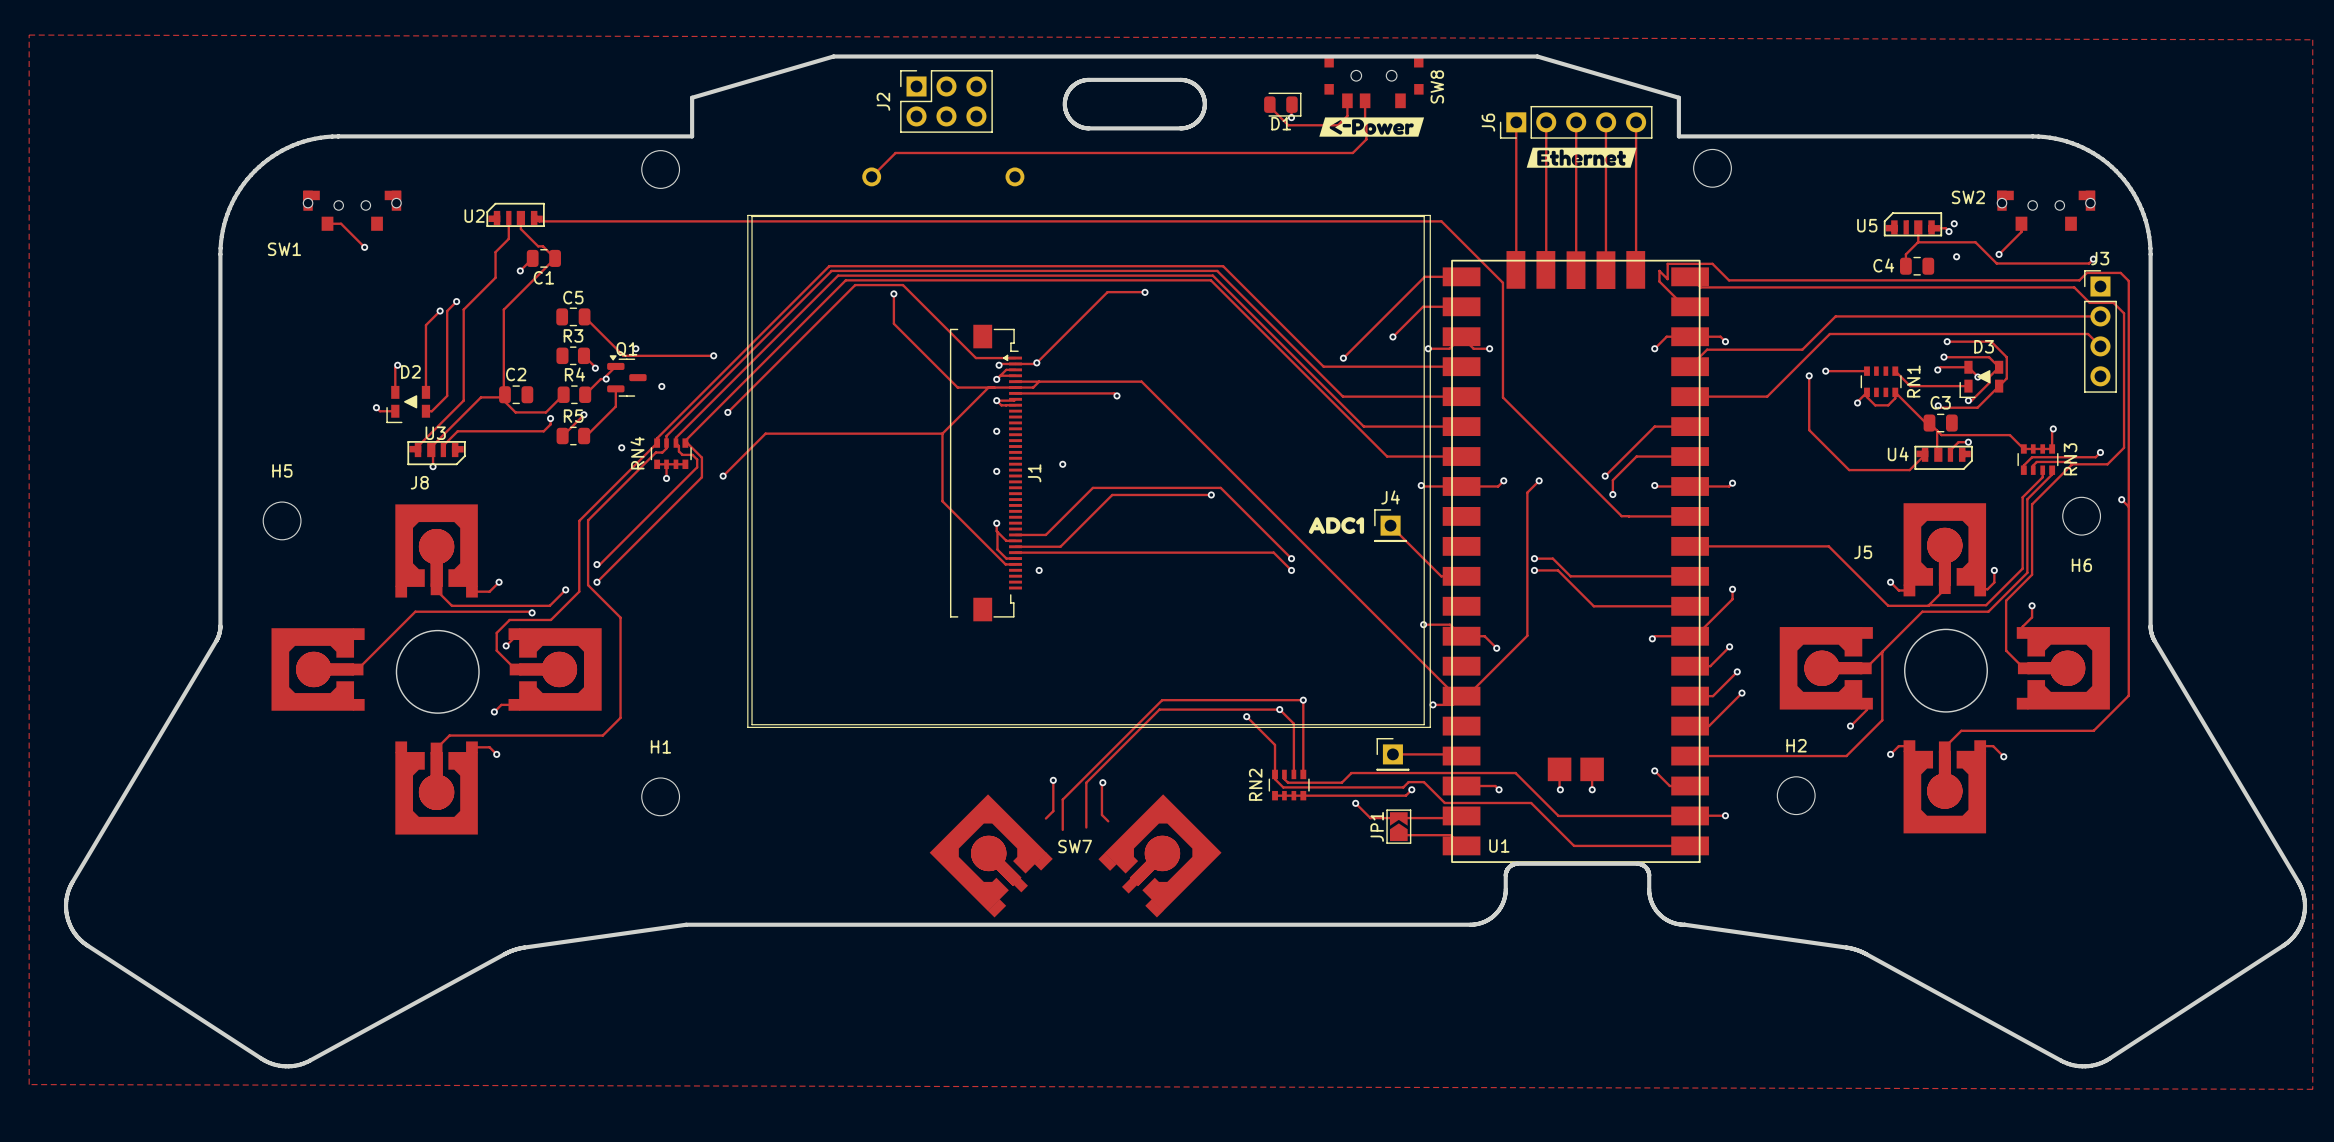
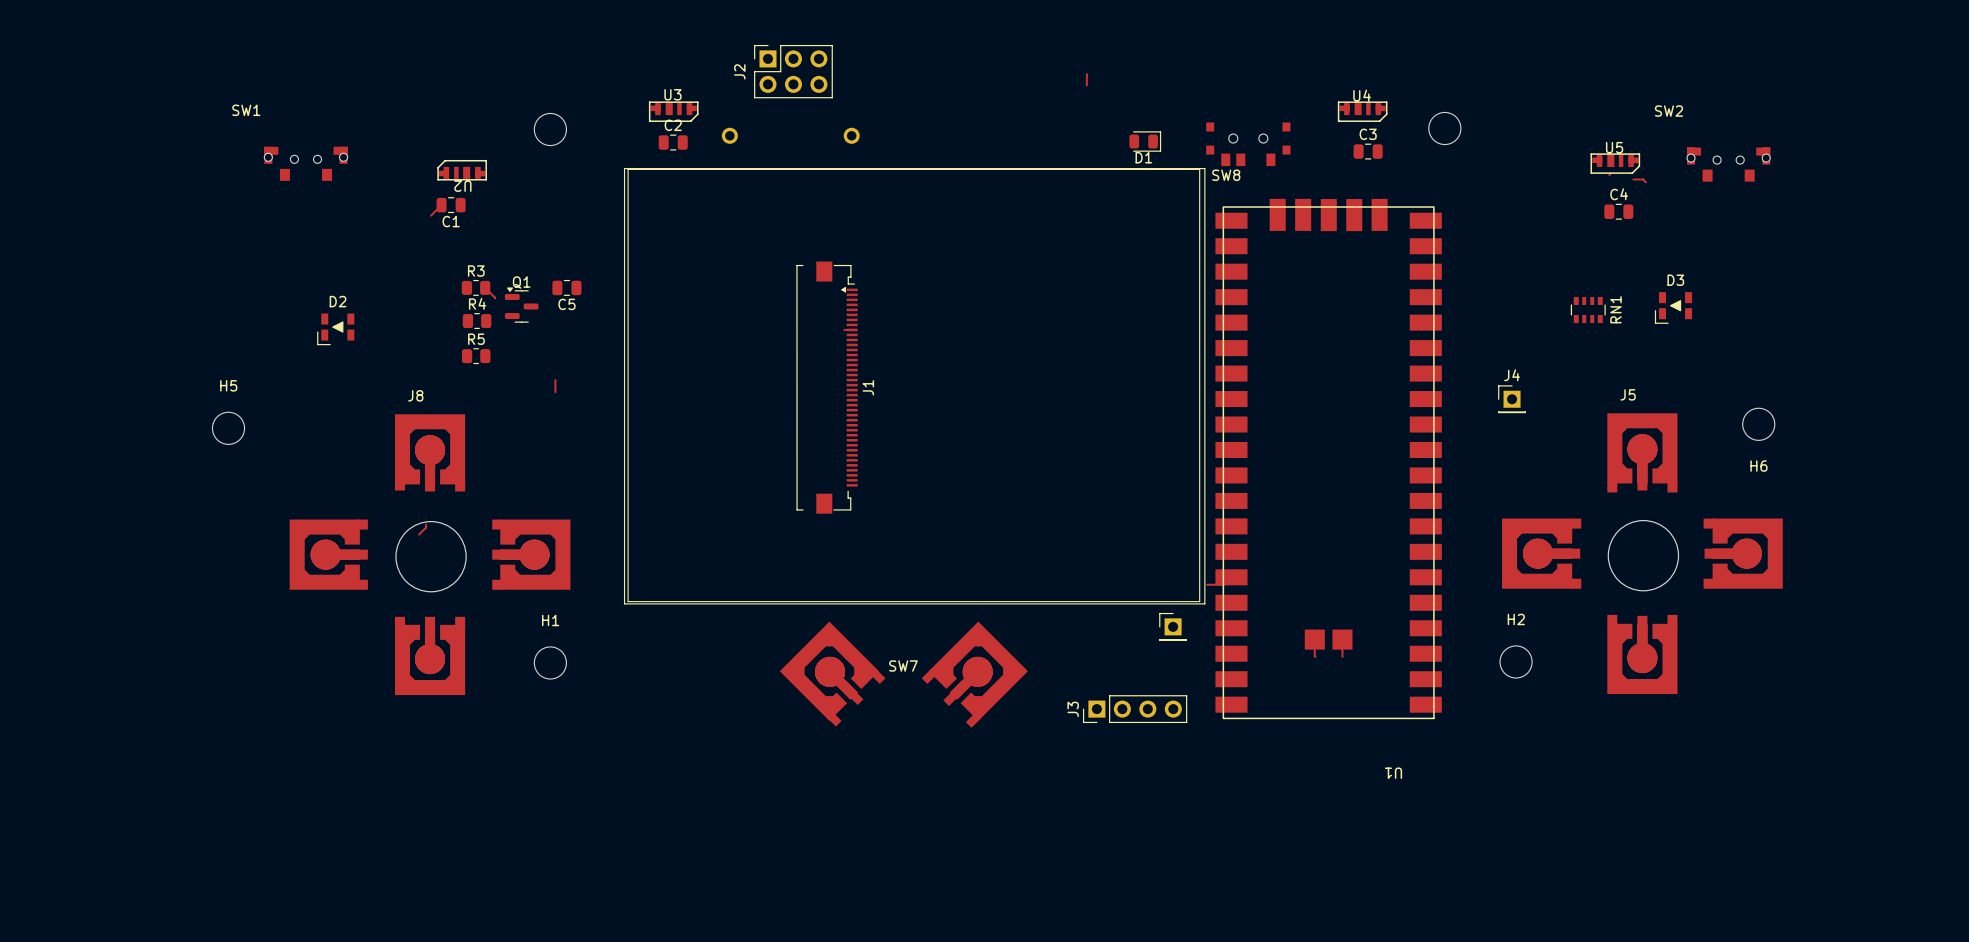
zone outline: (29, 35) (2312, 39) (2312, 1089) (29, 1084) (29, 35) -> none
board edge: (1087, 79) (1072, 86) (1067, 93) (1064, 101) (1068, 117) (1075, 124) (1082, 127) (1184, 128) (1196, 122) (1204, 110) (1204, 100) (1201, 91) (1195, 84) (1186, 80) (1087, 79) -> none
SW8 position: (1374, 82) -> (1248, 144)
SW8 name rotation: 0° (1437, 86) -> 90° clockwise (1226, 175)
SW8 name position: SW8 (1437, 86) -> SW8 (1226, 175)
track: (1347, 100) (1347, 115) (1338, 125) (1288, 125) (1269, 104) -> none
track: (1365, 100) (1366, 139) (1352, 152) (895, 152) (871, 176) -> none
D1 position: (1282, 104) -> (1145, 141)
via: (1291, 117) -> none
drawing: [1319, 117, 1425, 137] -> none
track: (1516, 122) (1515, 269) -> none
track: (1546, 122) (1545, 269) -> none
track: (1576, 122) (1576, 270) -> none
J6: (1576, 122) -> none
track: (1606, 122) (1605, 270) -> none
track: (1636, 122) (1635, 269) -> none
drawing: [1526, 147, 1637, 168] -> none
SW2 name position: SW2 (1968, 197) -> SW2 (1668, 111)
SW1 position: (352, 210) -> (305, 163)
U2 position: (515, 214) -> (462, 170)
U2 name rotation: 0° (474, 216) -> 180° (462, 186)
U2 name position: U2 (474, 216) -> U2 (462, 186)
track: (508, 217) (508, 238) (495, 252) (495, 277) (463, 309) (463, 400) (415, 448) -> none
track: (520, 217) (520, 229) (538, 246) (543, 246) (555, 258) (503, 309) (503, 400) (515, 412) (545, 412) (563, 394) -> none
track: (536, 218) (539, 221) (1441, 221) (1502, 282) (1502, 397) (1621, 516) (1690, 516) -> none
track: (327, 223) (341, 223) (364, 247) -> none
via: (1954, 223) -> none
track: (2021, 223) (2021, 232) (1999, 254) -> none
U5 rotation: 0° (1912, 224) -> 180° (1615, 163)
U5 name position: U5 (1867, 225) -> U5 (1614, 147)
track: (1918, 227) (1918, 242) (1905, 254) (1905, 266) -> none
via: (1949, 231) -> none
track: (1917, 242) (1975, 242) (1996, 263) (2089, 263) (2093, 259) -> none
via: (364, 247) -> none
SW1 name position: SW1 (284, 249) -> SW1 (246, 110)
via: (1999, 254) -> none
via: (1956, 256) -> none
via: (2093, 259) -> none
C4 name position: C4 (1883, 265) -> C4 (1619, 194)
via: (520, 270) -> none
track: (1461, 276) (1424, 276) (1343, 358) -> none
track: (1690, 276) (1700, 287) (2074, 287) (2089, 302) (2113, 302) (2124, 313) (2124, 447) (2107, 464) (2072, 464) -> none
track: (1145, 292) (1107, 292) (1035, 363) (999, 365) -> none
via: (1145, 292) -> none
track: (893, 293) (893, 323) (957, 387) (1033, 387) (1039, 381) -> none
via: (893, 293) -> none
C5 name position: C5 (573, 297) -> C5 (566, 304)
track: (456, 301) (447, 311) (447, 395) (431, 411) (425, 411) -> none
via: (456, 301) -> none
track: (1461, 306) (1423, 306) (1392, 336) -> none
track: (1690, 306) (1684, 306) (1659, 281) (1659, 270) (1667, 279) (1667, 263) (1712, 263) (1729, 280) (2079, 280) (2086, 272) (2120, 272) (2128, 280) (2128, 695) (2093, 730) (1961, 730) (1944, 747) -> none
track: (440, 311) (425, 325) (425, 392) -> none
via: (440, 311) -> none
C5 position: (573, 316) -> (566, 287)
track: (584, 316) (623, 355) (713, 355) -> none
track: (2100, 316) (1835, 316) (1802, 349) (1707, 349) (1690, 366) -> none
J3 rotation: 0° (2100, 331) -> 90° counterclockwise (1135, 709)
J3 position: (2100, 331) -> (1135, 709)
via: (1392, 336) -> none
track: (1725, 341) (1720, 336) (1666, 336) (1654, 348) -> none
via: (1725, 341) -> none
track: (1947, 341) (1991, 341) (2006, 357) (2006, 378) (1977, 407) (1940, 407) (1938, 405) -> none
via: (1947, 341) -> none
track: (2100, 346) (2088, 334) (1829, 334) (1767, 396) (1690, 396) -> none
via: (635, 348) -> none
track: (1428, 348) (1449, 348) (1461, 336) (1473, 348) (1489, 348) -> none
via: (1428, 348) -> none
via: (1489, 348) -> none
via: (1654, 348) -> none
via: (713, 355) -> none
via: (1943, 357) -> none
track: (1944, 357) (1989, 357) (1999, 367) (1989, 376) (1989, 382) (1971, 400) (1968, 400) -> none
track: (1015, 358) (975, 358) (902, 285) (855, 285) (727, 412) -> none
via: (1343, 358) -> none
via: (1036, 362) -> none
track: (397, 365) (395, 367) (395, 392) -> none
via: (397, 365) -> none
via: (999, 365) -> none
track: (615, 366) (606, 376) (606, 379) (600, 379) (585, 394) -> none
track: (1461, 366) (1323, 366) (1223, 266) (829, 266) (657, 438) (657, 443) (579, 520) (579, 591) (550, 619) (509, 619) (496, 632) (496, 650) (515, 669) -> none
via: (595, 368) -> none
track: (1015, 369) (1006, 369) (996, 379) -> none
track: (1937, 369) (1940, 367) (1968, 367) (1977, 377) -> none
via: (1937, 369) -> none
track: (1825, 371) (1866, 371) -> none
via: (1825, 371) -> none
track: (1895, 371) (1910, 386) (1968, 386) -> none
track: (1000, 375) (1015, 375) -> none
track: (1809, 375) (1809, 430) (1849, 470) (1909, 470) (1925, 454) -> none
via: (1809, 375) -> none
via: (1977, 377) -> none
via: (606, 379) -> none
via: (996, 379) -> none
track: (1015, 381) (1141, 381) (1456, 696) (1466, 696) (1527, 635) (1527, 492) (1539, 480) -> none
via: (661, 386) -> none
track: (988, 387) (942, 433) -> none
track: (615, 388) (615, 406) (586, 436) (584, 436) -> none
track: (1015, 393) (1114, 393) (1116, 395) -> none
C2 position: (516, 394) -> (673, 142)
via: (1116, 395) -> none
track: (1461, 396) (1342, 396) (1217, 270) (831, 270) (666, 436) (666, 448) (662, 452) (655, 452) (588, 520) (588, 585) (620, 617) (620, 717) (602, 735) (449, 735) (436, 748) -> none
track: (503, 397) (480, 397) (431, 447) (433, 466) -> none
track: (1015, 399) (996, 400) (1001, 405) (1006, 405) -> none
via: (996, 400) -> none
via: (1968, 400) -> none
track: (1857, 402) (1866, 392) (1866, 397) (1875, 405) (1888, 405) (1895, 398) (1895, 392) (1925, 423) (1929, 423) (1941, 435) (2009, 435) (2023, 448) (2052, 448) (2053, 428) -> none
via: (1857, 402) -> none
via: (1938, 405) -> none
track: (376, 407) (379, 411) (395, 411) -> none
via: (376, 407) -> none
via: (727, 412) -> none
track: (583, 414) (562, 436) -> none
via: (583, 414) -> none
track: (550, 418) (550, 424) (543, 431) (457, 431) (443, 445) (443, 450) -> none
via: (550, 418) -> none
C3 position: (1940, 423) -> (1368, 151)
track: (1461, 426) (1363, 426) (1212, 275) (838, 275) (675, 437) (678, 451) (682, 454) (692, 454) (697, 459) (697, 467) (599, 564) (596, 564) -> none
track: (1690, 426) (1654, 426) (1605, 476) -> none
via: (2053, 428) -> none
track: (1937, 430) (1938, 454) -> none
via: (996, 431) -> none
track: (942, 433) (765, 433) (723, 476) -> none
track: (942, 433) (942, 501) (1005, 564) (1015, 564) -> none
track: (1968, 442) (1958, 442) (1950, 450) (1949, 455) -> none
via: (1968, 442) -> none
via: (621, 447) -> none
track: (2100, 452) (2095, 457) (2032, 457) (2023, 465) (2023, 470) -> none
via: (2100, 452) -> none
U3 position: (436, 453) -> (673, 111)
RN4: (671, 453) -> none
U4 name position: U4 (1898, 454) -> U4 (1362, 95)
track: (1461, 456) (1387, 456) (1210, 280) (845, 280) (685, 440) (685, 443) (701, 457) (701, 477) (596, 582) -> none
track: (1690, 456) (1636, 456) (1612, 480) (1612, 494) -> none
U4 position: (1943, 457) -> (1362, 111)
RN3: (2037, 459) -> none
track: (657, 464) (685, 464) -> none
via: (1062, 464) -> none
track: (2072, 464) (2069, 461) (2036, 461) (2033, 465) (2033, 470) -> none
track: (2072, 464) (2032, 504) (2032, 574) (2006, 600) (2006, 650) (2023, 668) -> none
via: (433, 466) -> none
track: (2042, 470) (2042, 477) (2022, 497) (2022, 568) (1986, 605) (1928, 605) -> none
track: (2052, 470) (2052, 474) (2027, 499) (2027, 572) (1988, 611) (1922, 611) (1865, 668) -> none
via: (996, 471) -> none
via: (723, 476) -> none
via: (1605, 476) -> none
via: (666, 478) -> none
track: (1503, 480) (1498, 486) (1421, 485) -> none
via: (1503, 480) -> none
via: (1539, 480) -> none
track: (1732, 483) (1729, 486) (1654, 485) -> none
via: (1732, 483) -> none
via: (1421, 485) -> none
via: (1654, 485) -> none
track: (1211, 494) (1112, 494) (1060, 546) (1015, 546) -> none
via: (1211, 494) -> none
via: (1612, 494) -> none
track: (2121, 499) (2128, 506) -> none
via: (2121, 499) -> none
J8 footprint: [271, 504, 602, 835] -> [289, 414, 571, 696]
drawing: [1308, 517, 1365, 535] -> none
track: (996, 523) (996, 531) (1006, 540) (1015, 540) -> none
via: (996, 523) -> none
track: (1390, 525) (1441, 576) (1461, 576) -> none
J4 position: (1390, 525) -> (1512, 399)
track: (997, 531) (997, 549) (1006, 558) (1015, 558) -> none
track: (1015, 534) (1045, 534) (1092, 487) (1220, 487) (1291, 558) -> none
track: (1690, 546) (1828, 546) (1888, 605) (1928, 605) (1944, 589) -> none
track: (1015, 552) (1273, 552) (1291, 570) -> none
J5 name position: J5 (1863, 552) -> J5 (1628, 394)
via: (1291, 558) -> none
track: (1534, 558) (1552, 558) (1570, 576) (1690, 576) -> none
via: (1534, 558) -> none
via: (596, 564) -> none
via: (1039, 570) -> none
via: (1291, 570) -> none
track: (1534, 570) (1558, 570) (1593, 606) (1690, 606) -> none
via: (1534, 570) -> none
track: (1994, 570) (1994, 582) (1987, 589) (1980, 590) -> none
via: (1994, 570) -> none
track: (499, 582) (489, 591) (471, 591) -> none
via: (499, 582) -> none
via: (596, 582) -> none
track: (1890, 582) (1898, 590) (1909, 590) -> none
via: (1890, 582) -> none
track: (565, 589) (549, 605) (451, 605) (436, 590) -> none
via: (565, 589) -> none
track: (1732, 589) (1732, 599) (1695, 636) (1654, 636) (1652, 638) -> none
via: (1732, 589) -> none
track: (2032, 605) (2032, 617) (2022, 626) (2022, 632) -> none
via: (2032, 605) -> none
track: (532, 612) (415, 611) (357, 669) -> none
via: (532, 612) -> none
track: (1423, 624) (1450, 624) (1461, 636) (1484, 636) (1496, 648) -> none
via: (1423, 624) -> none
via: (1652, 638) -> none
via: (506, 645) -> none
track: (1729, 646) (1710, 666) (1690, 666) -> none
via: (1729, 646) -> none
via: (1496, 648) -> none
track: (1882, 651) (1882, 720) (1846, 756) (1690, 756) -> none
track: (1737, 671) (1712, 696) (1690, 696) -> none
via: (1737, 671) -> none
track: (1741, 693) (1708, 726) (1690, 726) -> none
via: (1741, 693) -> none
via: (1303, 700) -> none
track: (1866, 703) (1866, 709) (1850, 726) -> none
track: (514, 704) (501, 704) (494, 711) -> none
via: (1433, 704) -> none
via: (1279, 709) -> none
via: (494, 711) -> none
track: (1246, 716) (1275, 744) (1275, 779) (1283, 787) (1403, 787) (1408, 782) (1423, 782) (1444, 802) (1531, 802) (1574, 845) (1690, 845) -> none
via: (1246, 716) -> none
via: (1850, 726) -> none
track: (1909, 746) (1898, 746) (1890, 754) -> none
track: (1980, 746) (1993, 746) (2003, 756) -> none
track: (471, 747) (489, 747) (496, 754) -> none
via: (496, 754) -> none
track: (1392, 754) (1459, 754) (1461, 756) -> none
via: (1890, 754) -> none
via: (2003, 756) -> none
track: (1654, 770) (1669, 786) (1690, 786) -> none
via: (1654, 770) -> none
track: (1284, 774) (1284, 779) (1287, 782) (1341, 782) (1351, 773) (1515, 773) (1558, 815) (1725, 815) -> none
track: (1293, 774) (1293, 723) (1279, 709) (1159, 709) (1086, 782) (1086, 827) -> none
track: (1303, 774) (1303, 700) (1162, 700) (1062, 799) (1062, 829) -> none
track: (1053, 780) (1053, 811) (1045, 818) -> none
via: (1053, 780) -> none
track: (1102, 782) (1101, 815) (1108, 821) -> none
via: (1102, 782) -> none
RN2: (1289, 785) -> none
track: (1461, 786) (1495, 786) (1499, 789) -> none
track: (1411, 789) (1405, 795) (1275, 795) -> none
via: (1411, 789) -> none
via: (1499, 789) -> none
via: (1560, 789) -> none
via: (1592, 789) -> none
SW7 footprint: [929, 794, 1222, 918] -> [779, 621, 1028, 728]
track: (1355, 803) (1370, 818) (1459, 818) (1461, 815) -> none
via: (1355, 803) -> none
via: (1725, 815) -> none
JP1: (1398, 826) -> none
track: (1398, 835) (1450, 835) (1461, 845) -> none
U1 name rotation: 0° (1499, 845) -> 180° (1393, 773)
U1 name position: U1 (1499, 845) -> U1 (1393, 773)
board edge: (1684, 924) (1667, 920) (1656, 910) (1649, 896) (1648, 871) (1643, 865) (1637, 863) (1513, 864) (1506, 872) (1505, 894) (1499, 909) (1487, 920) (1472, 924) (686, 924) (514, 949) (307, 1062) (288, 1066) (267, 1061) (83, 942) (70, 927) (66, 907) (67, 894) (71, 883) (219, 632) (220, 248) (224, 224) (232, 203) (247, 179) (267, 159) (292, 145) (320, 137) (692, 136) (692, 97) (833, 56) (1537, 56) (1678, 97) (1678, 136) (2038, 136) (2061, 139) (2088, 150) (2111, 166) (2127, 184) (2141, 209) (2149, 236) (2151, 633) (2299, 883) (2304, 905) (2300, 927) (2285, 944) (2109, 1058) (2097, 1064) (2082, 1066) (2061, 1060) (1857, 950) (1684, 924) -> none

